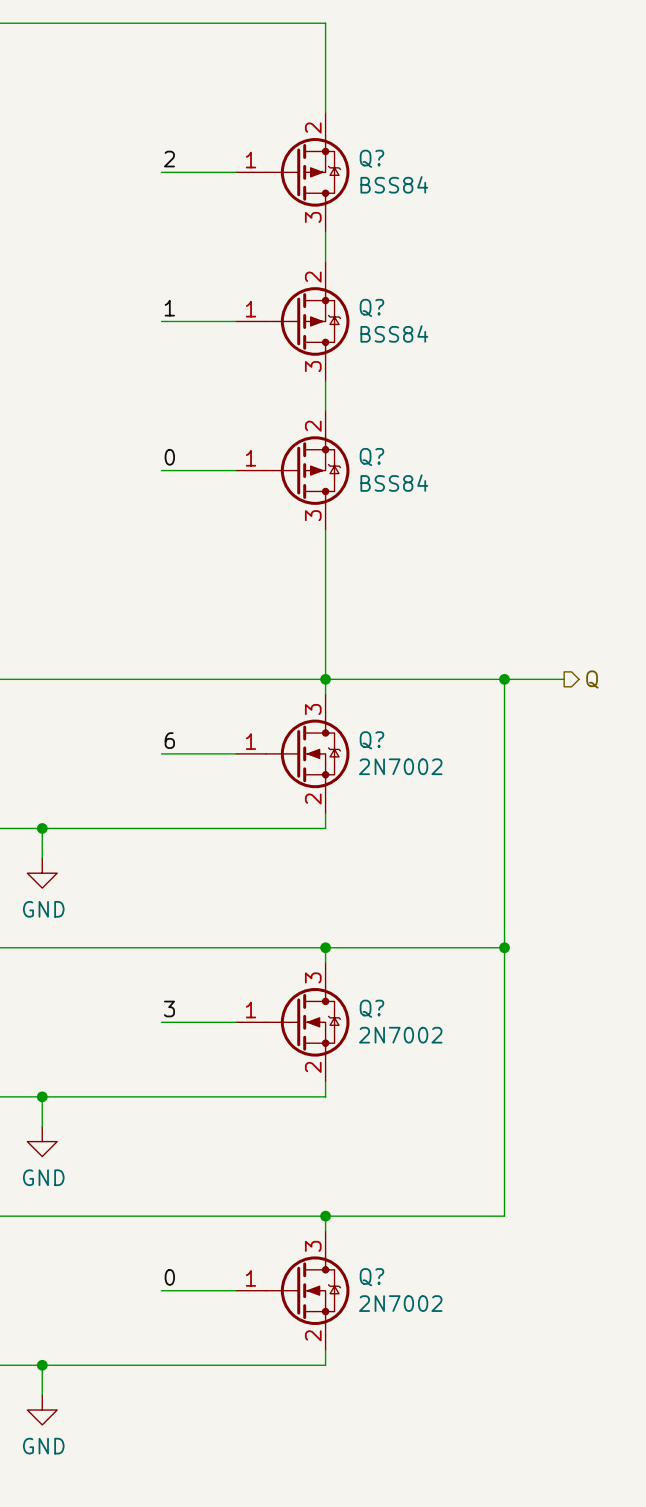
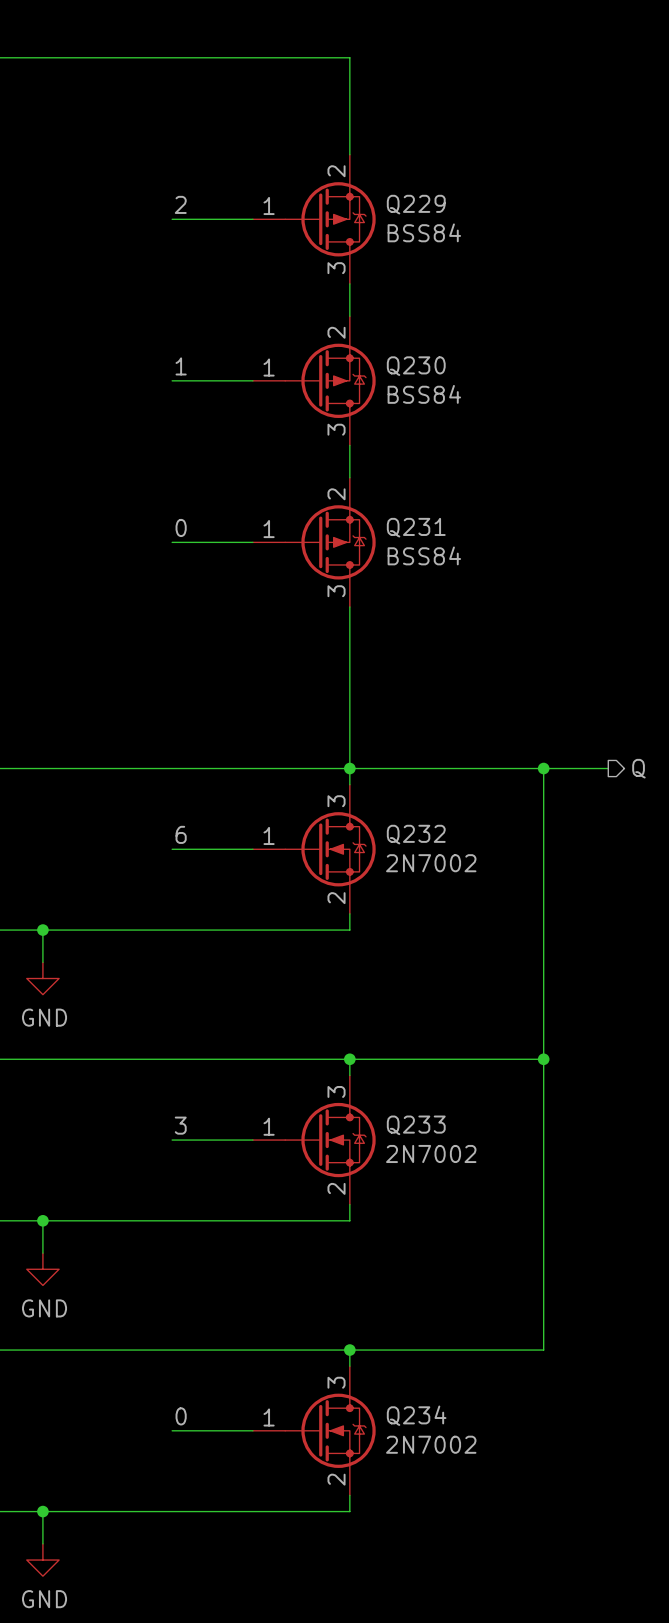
Q? name: Q? (371, 158) -> Q229 (416, 204)
Q? name: Q? (371, 307) -> Q230 (416, 366)
Q? name: Q? (371, 457) -> Q231 (416, 527)
Q? name: Q? (371, 740) -> Q232 (416, 834)
Q? name: Q? (371, 1008) -> Q233 (416, 1125)
Q? name: Q? (371, 1277) -> Q234 (416, 1415)

